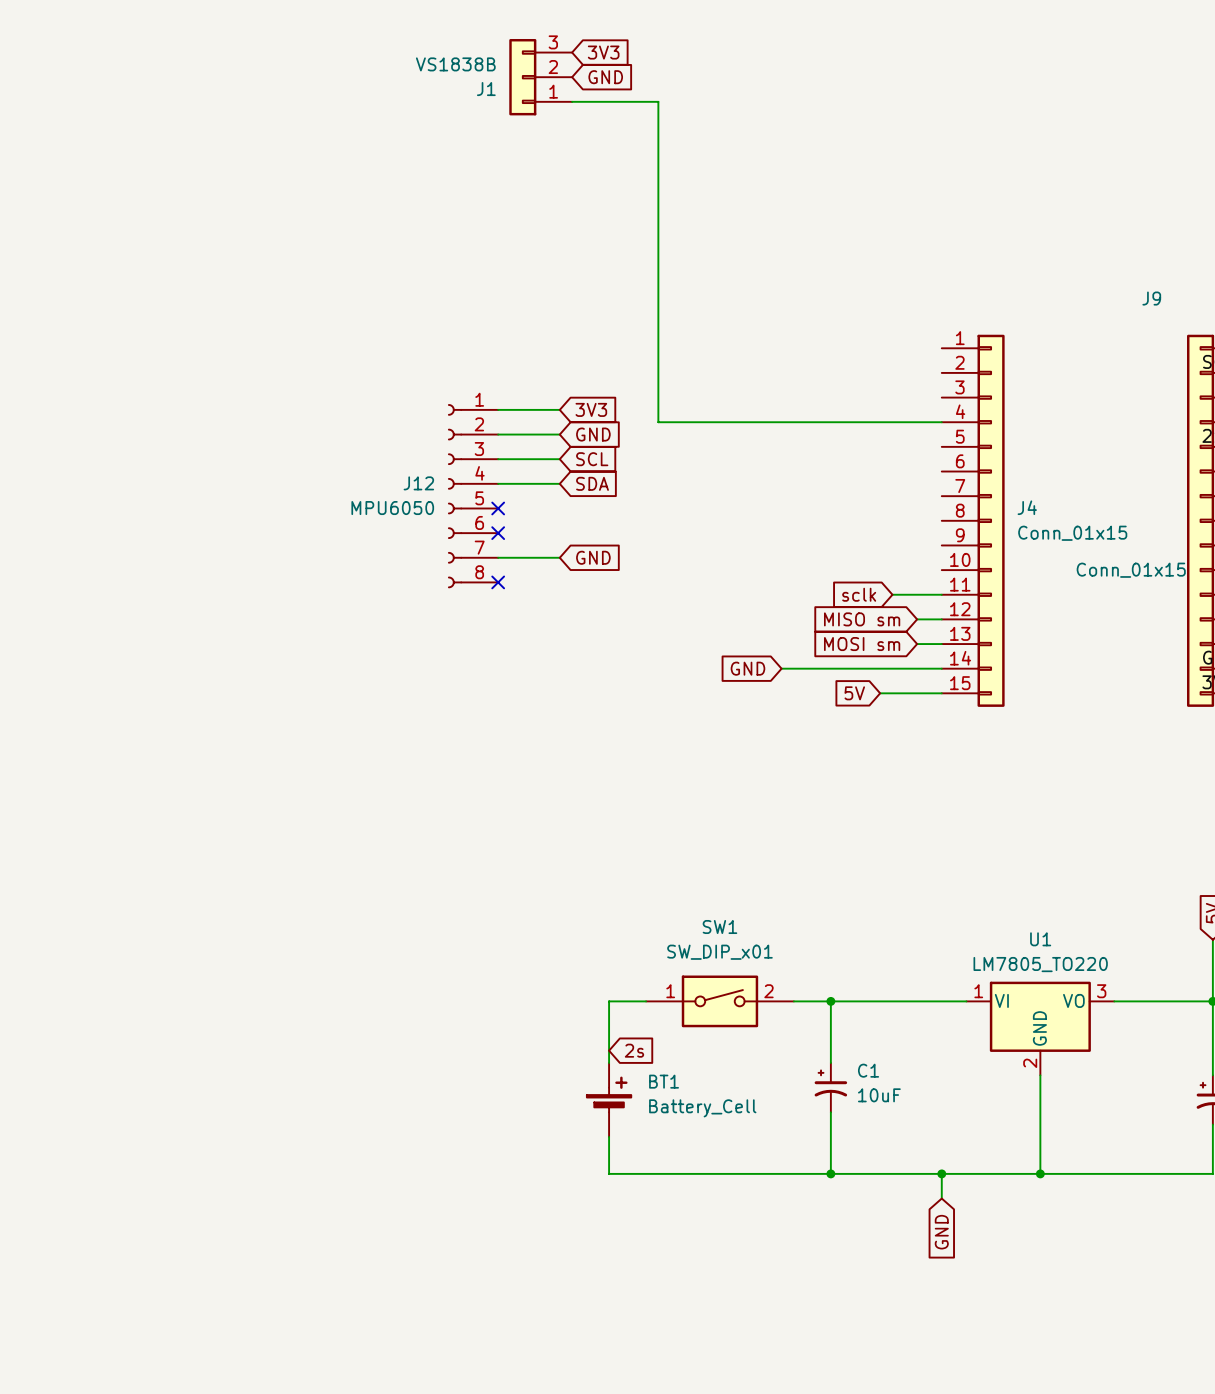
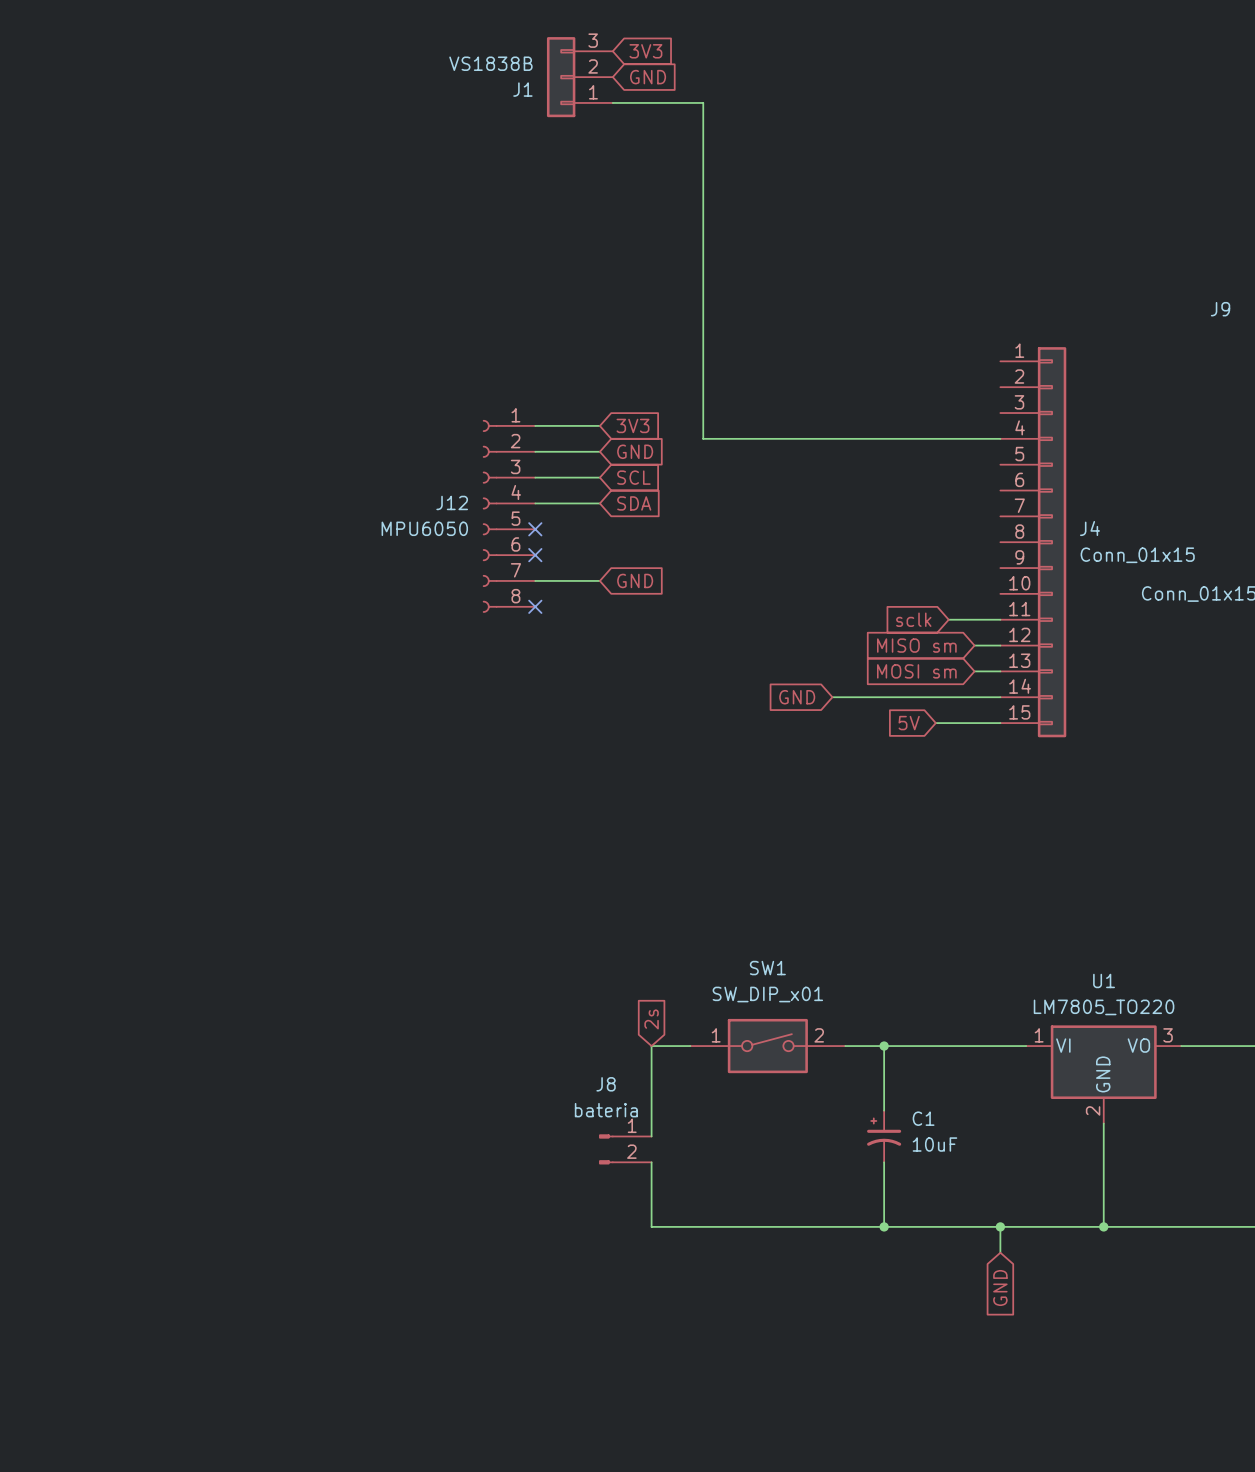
global label rotation: 0° (634, 1050) -> 90° counterclockwise (651, 1019)
global label position: 2s (634, 1050) -> 2s (651, 1019)
J8: none -> bateria (625, 1149)
BT1: Battery_Cell (609, 1099) -> none

